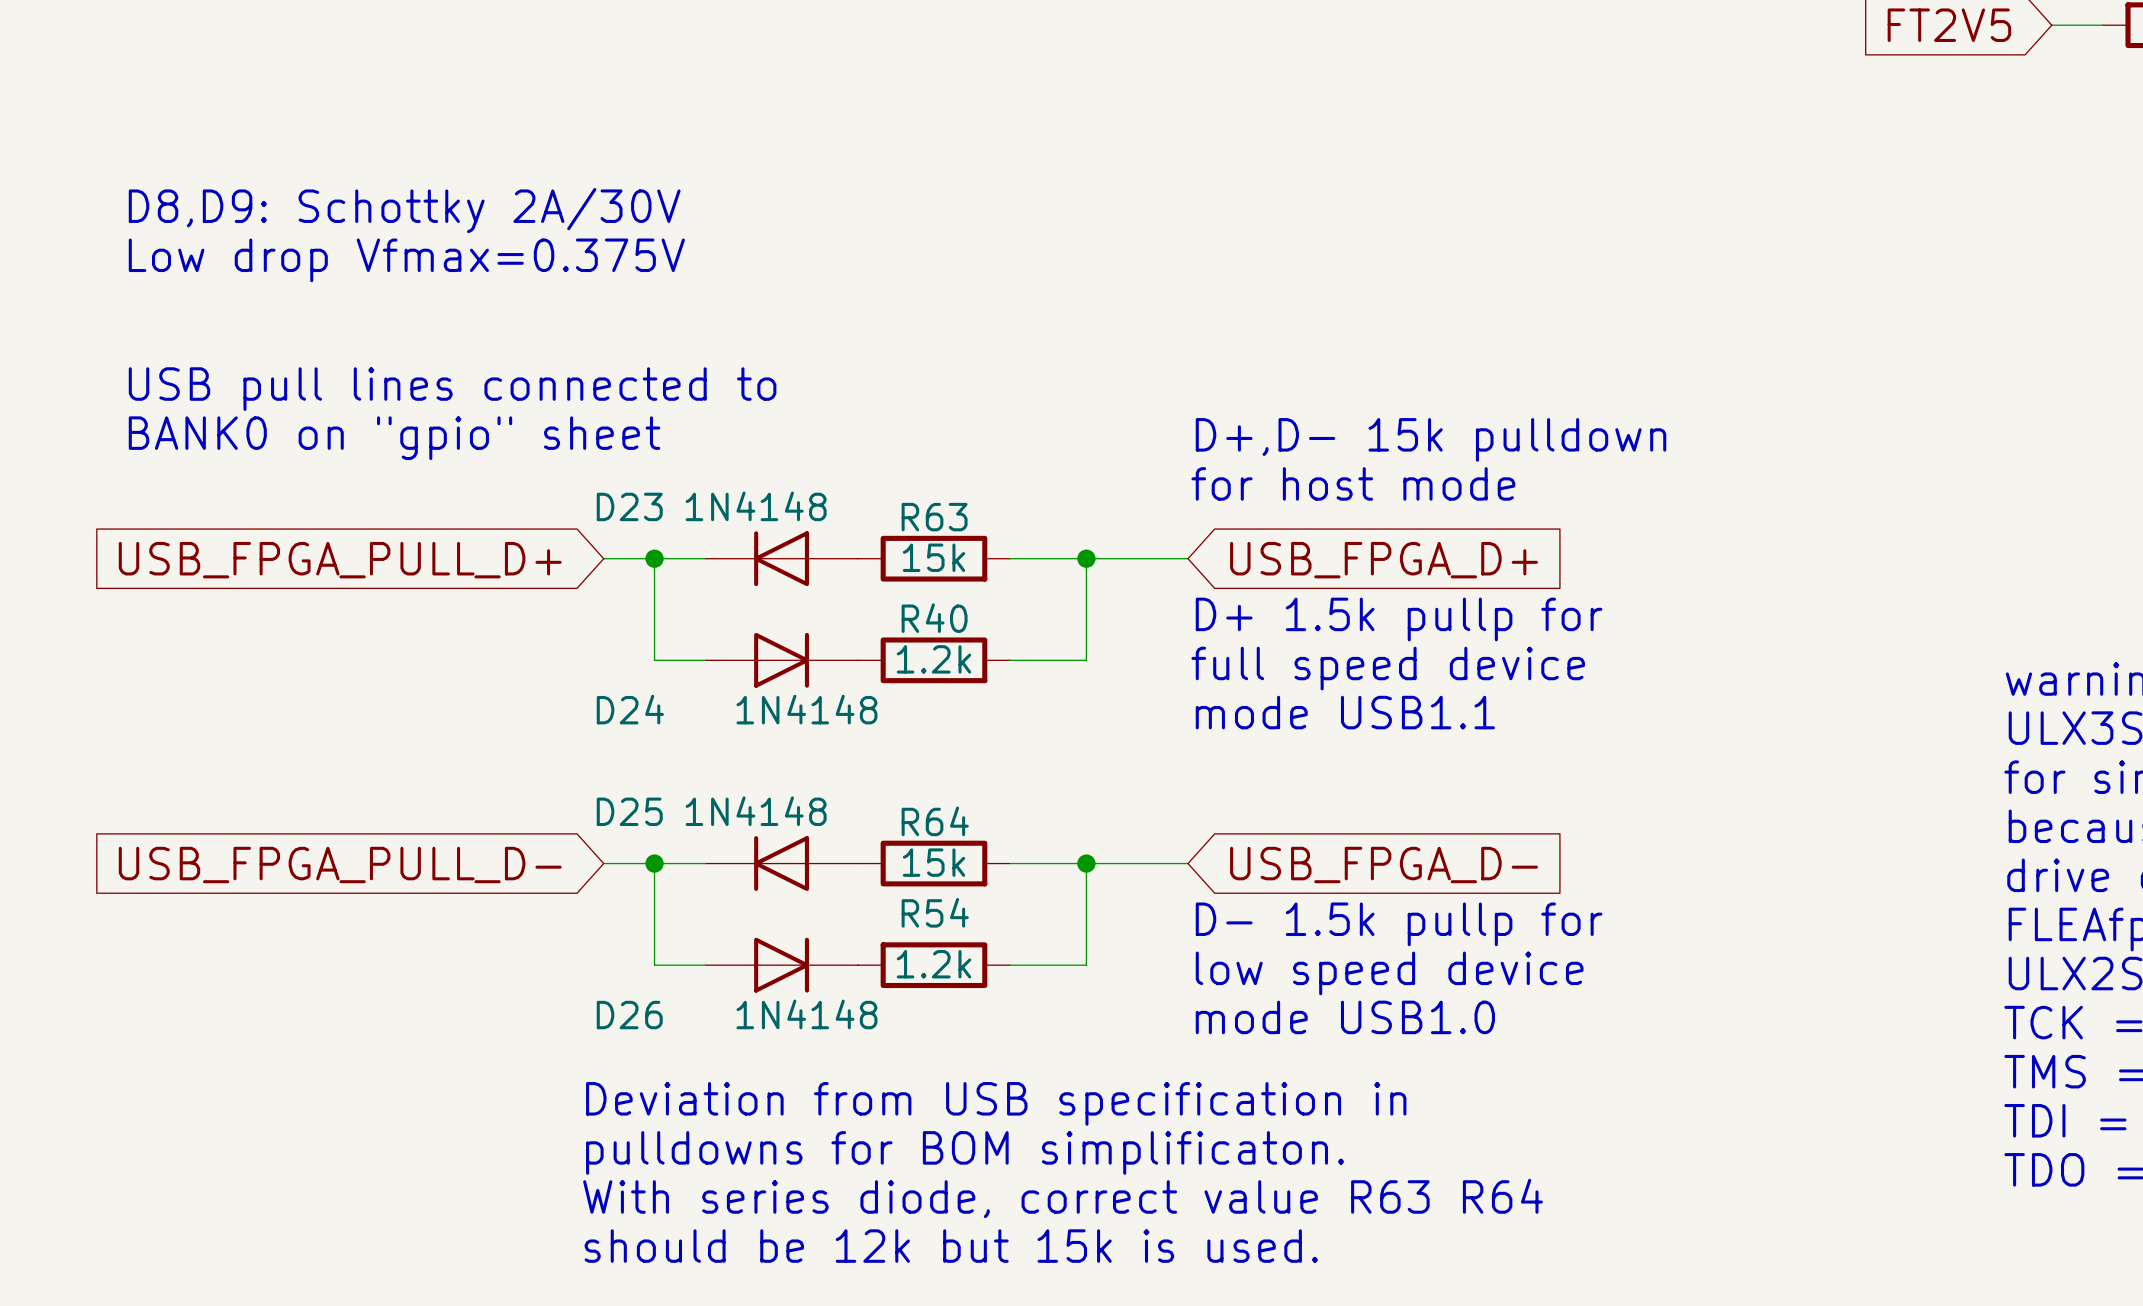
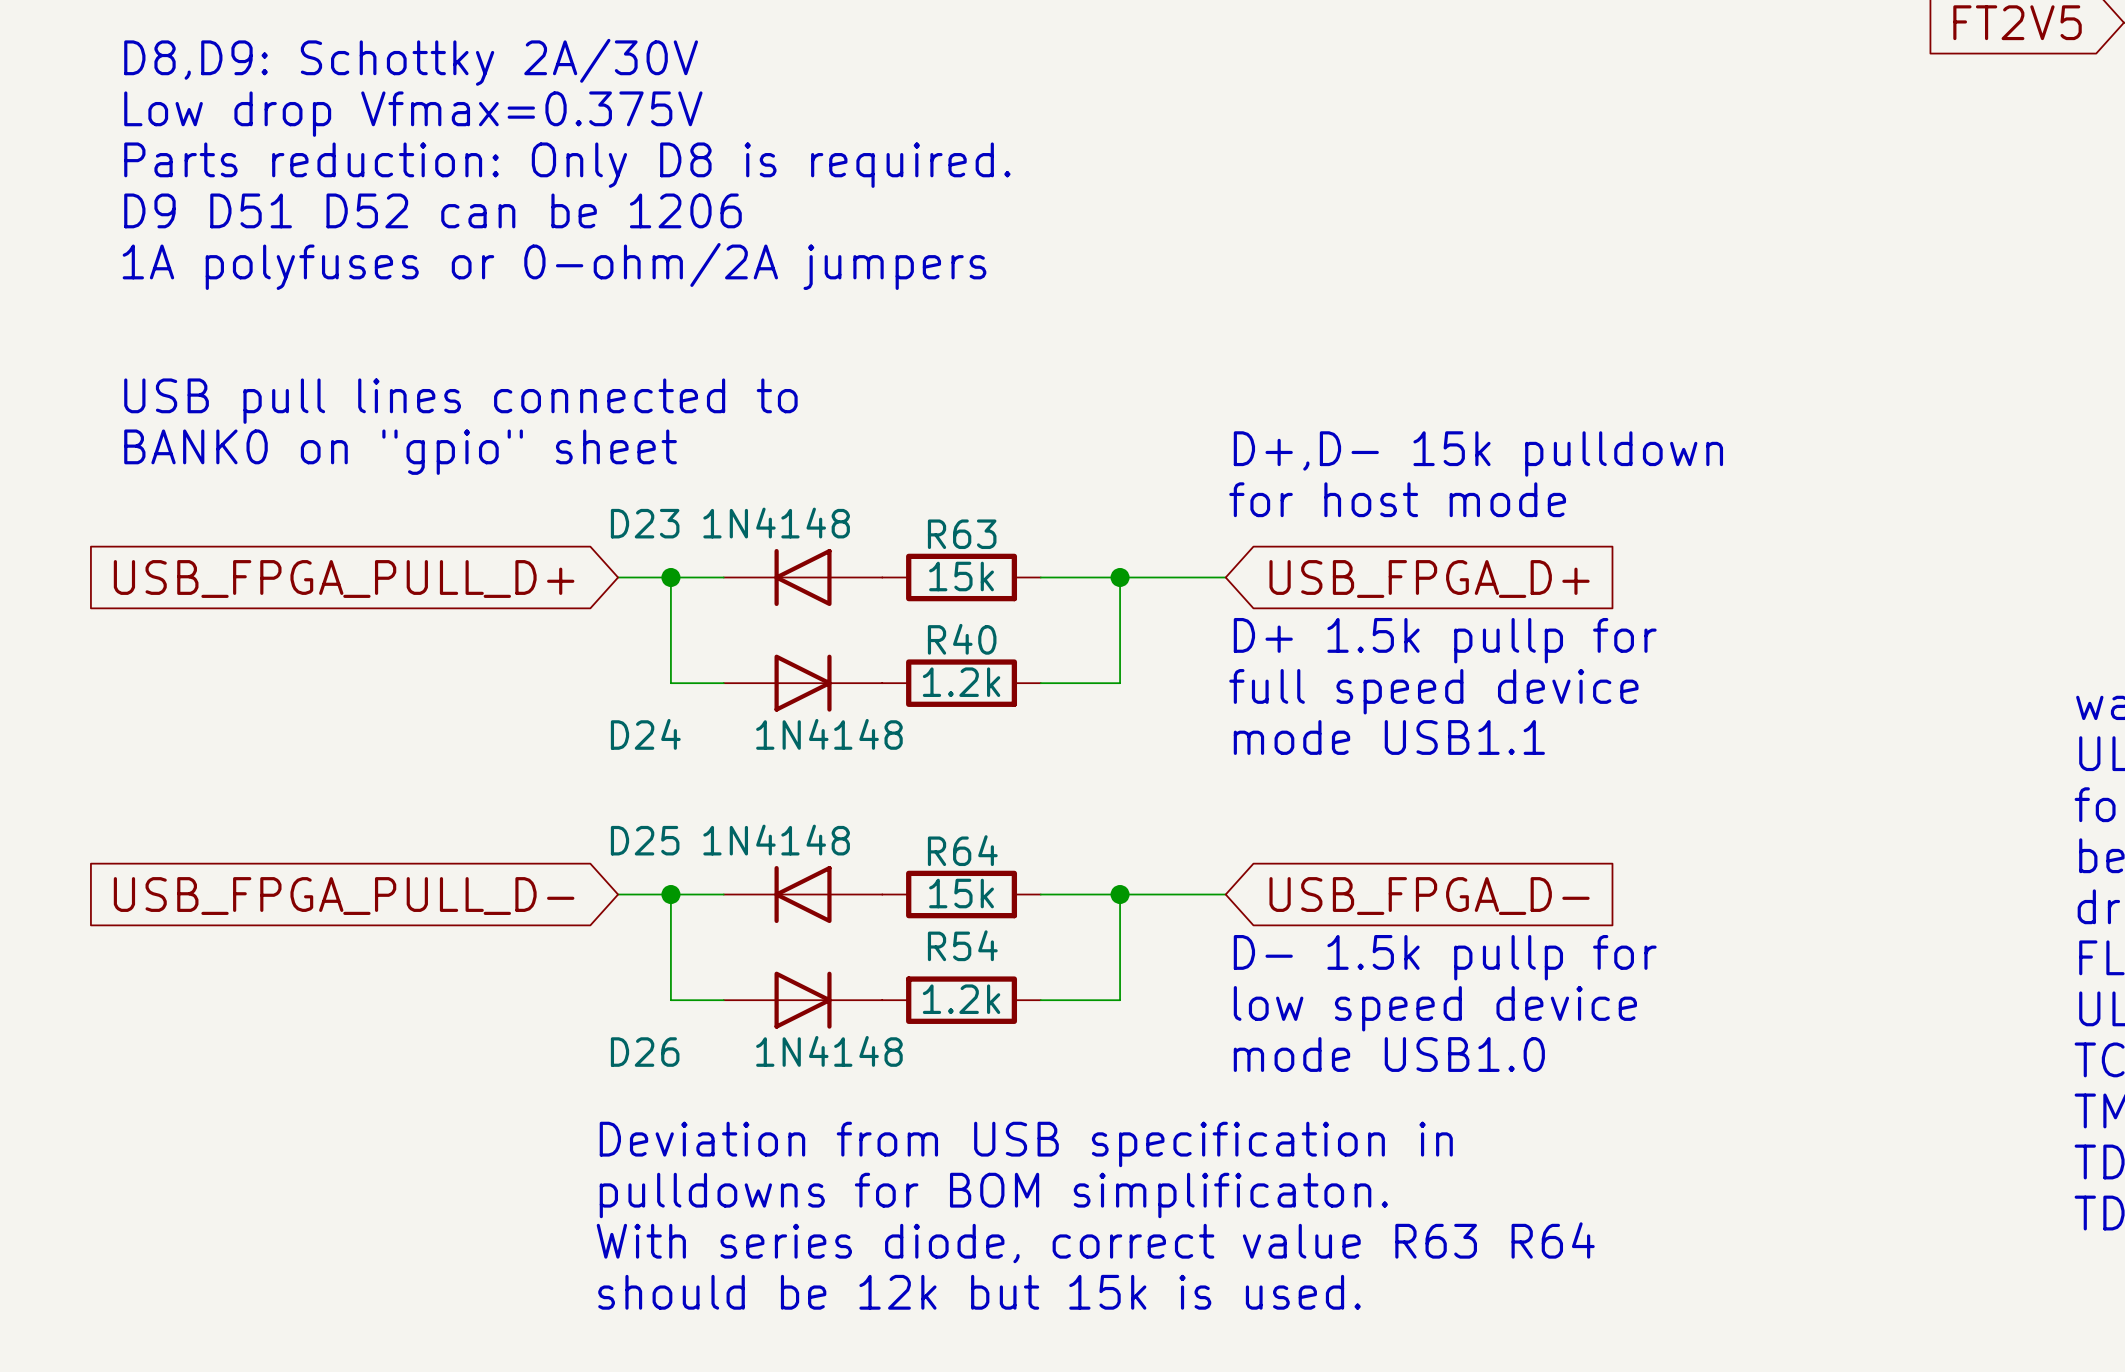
text: none -> D8,D9: Schottky 2A/30V (411, 62)
text: none -> Low drop Vfmax=0.375V (413, 114)
text: none -> Parts reduction: Only D8 is required. (567, 165)
text: D8,D9: Schottky 2A/30V (404, 210) -> D9 D51 D52 can be 1206 (432, 210)
text: Low drop Vfmax=0.375V (406, 260) -> 1A polyfuses or 0-ohm/2A jumpers (554, 266)

